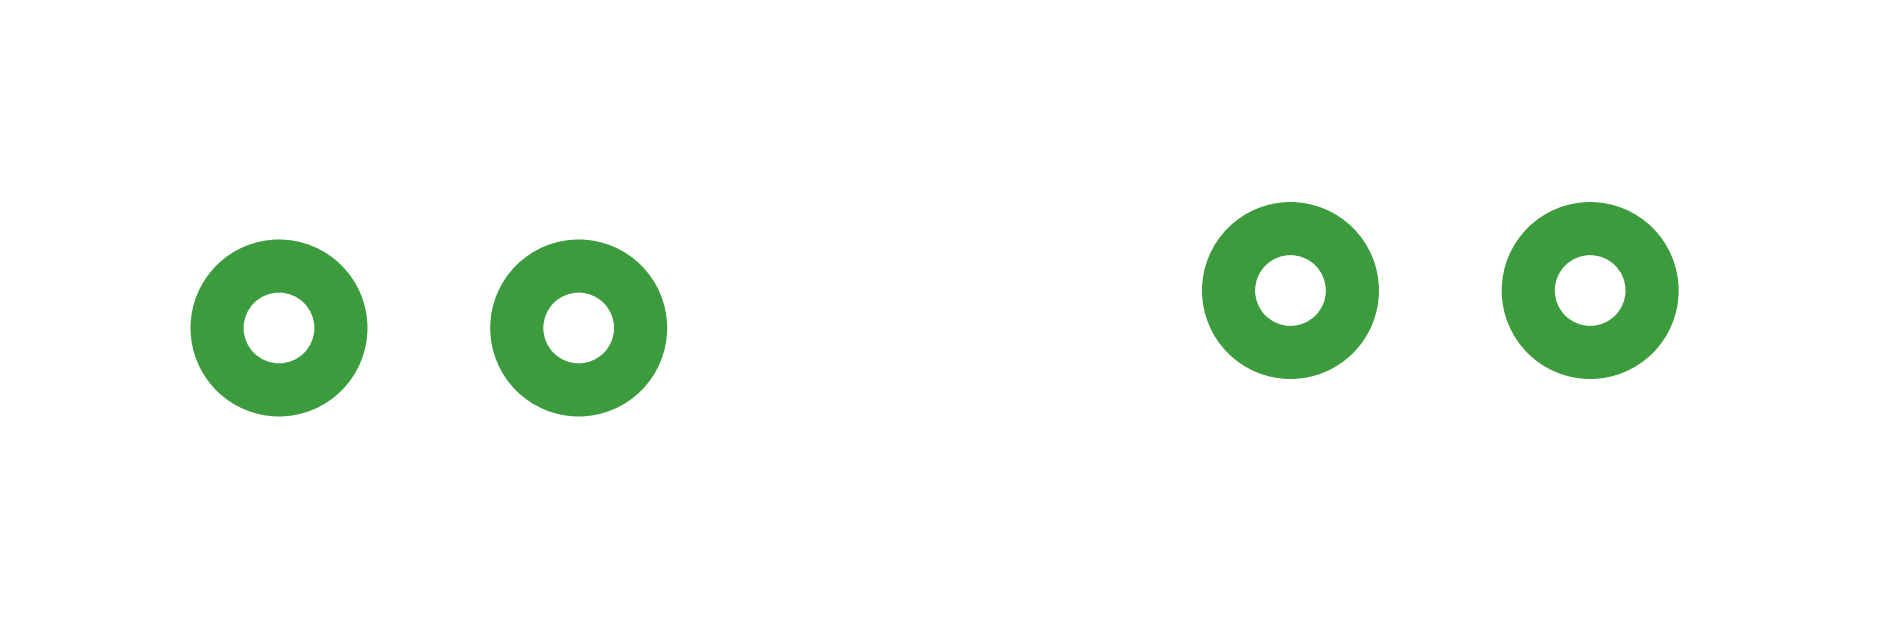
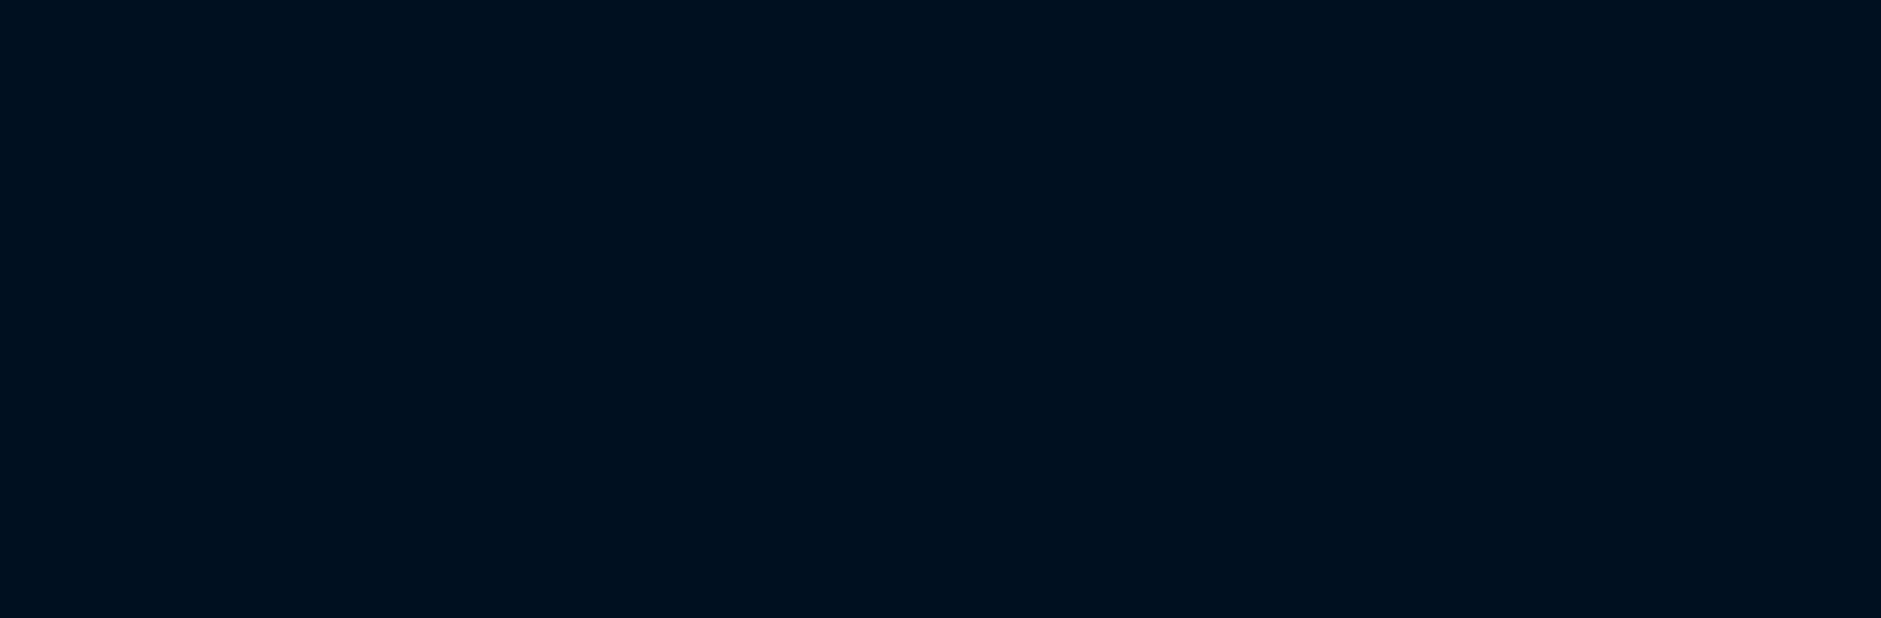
part: (1440, 290) -> none
part: (428, 327) -> none

